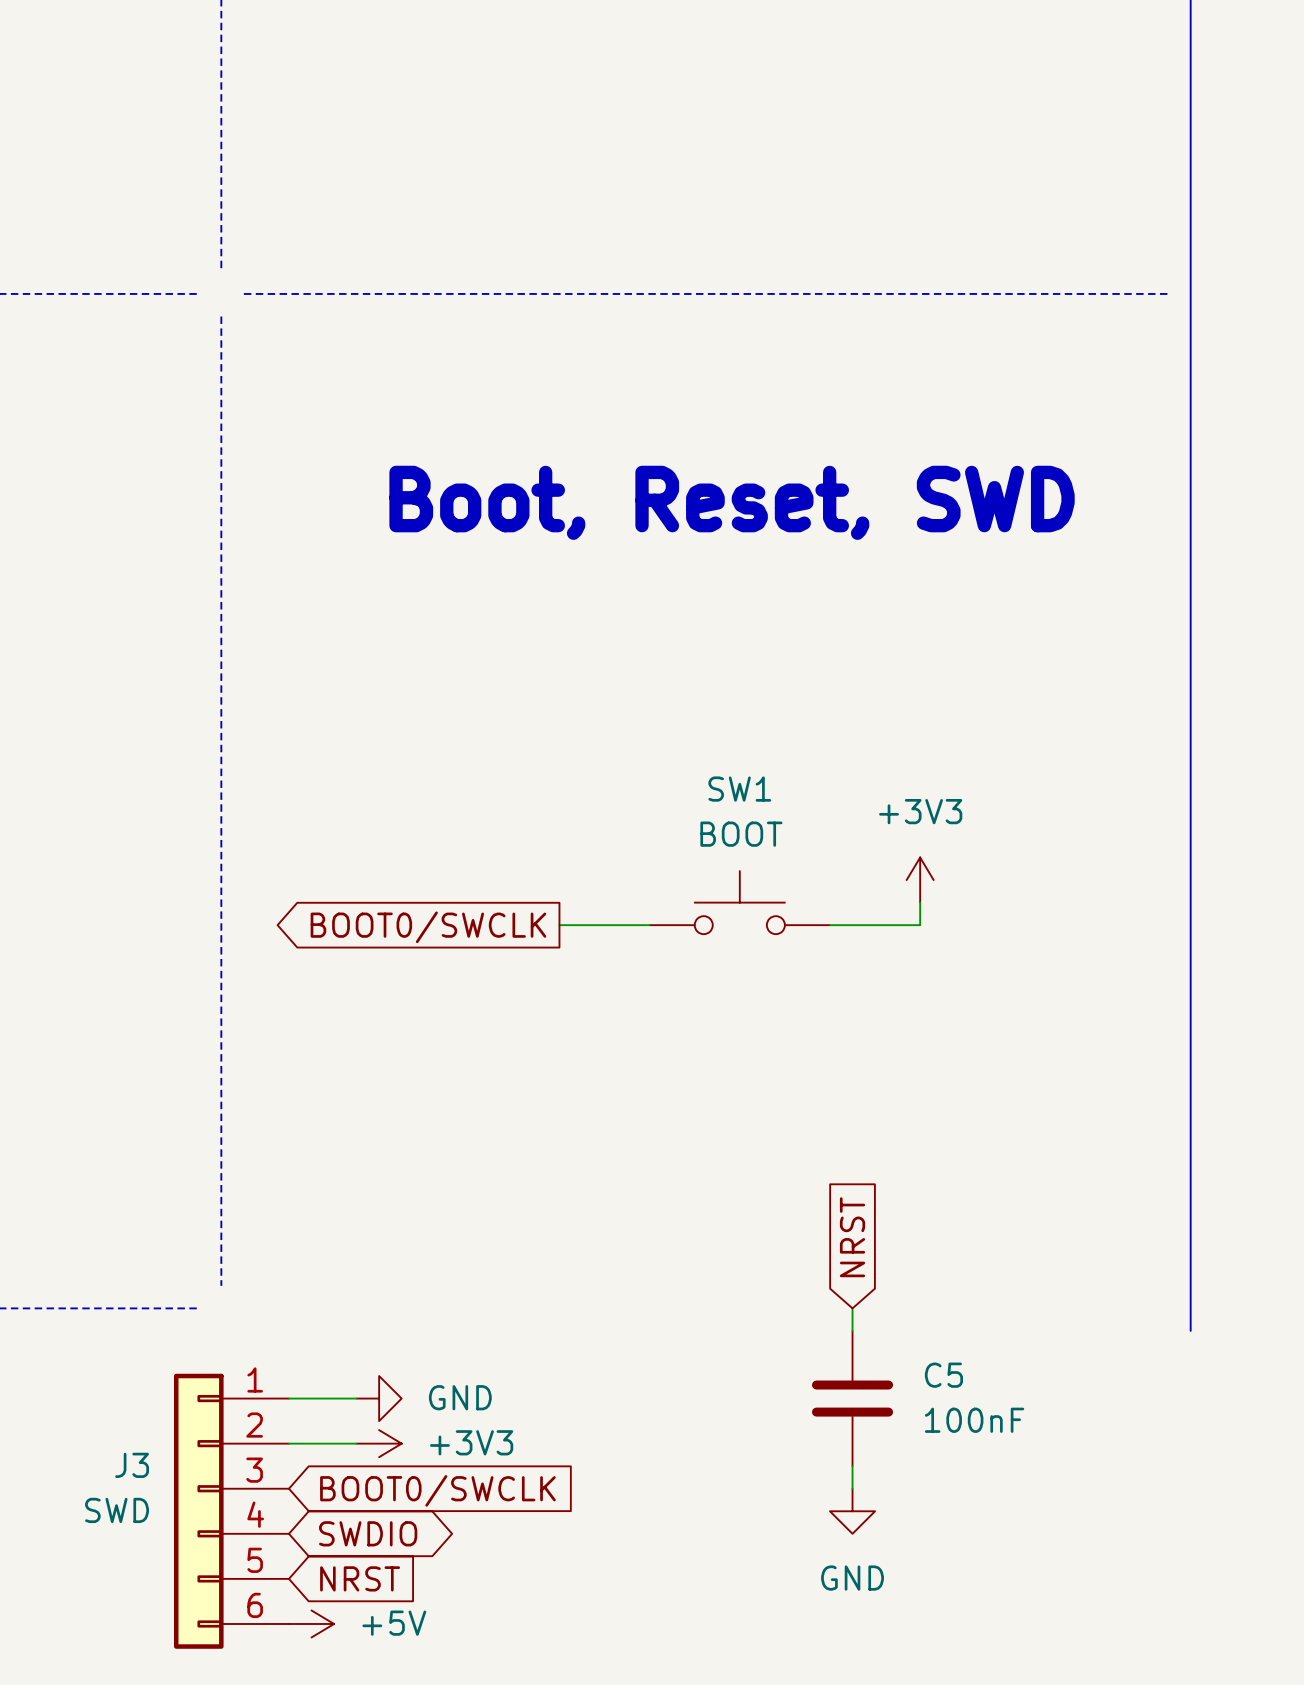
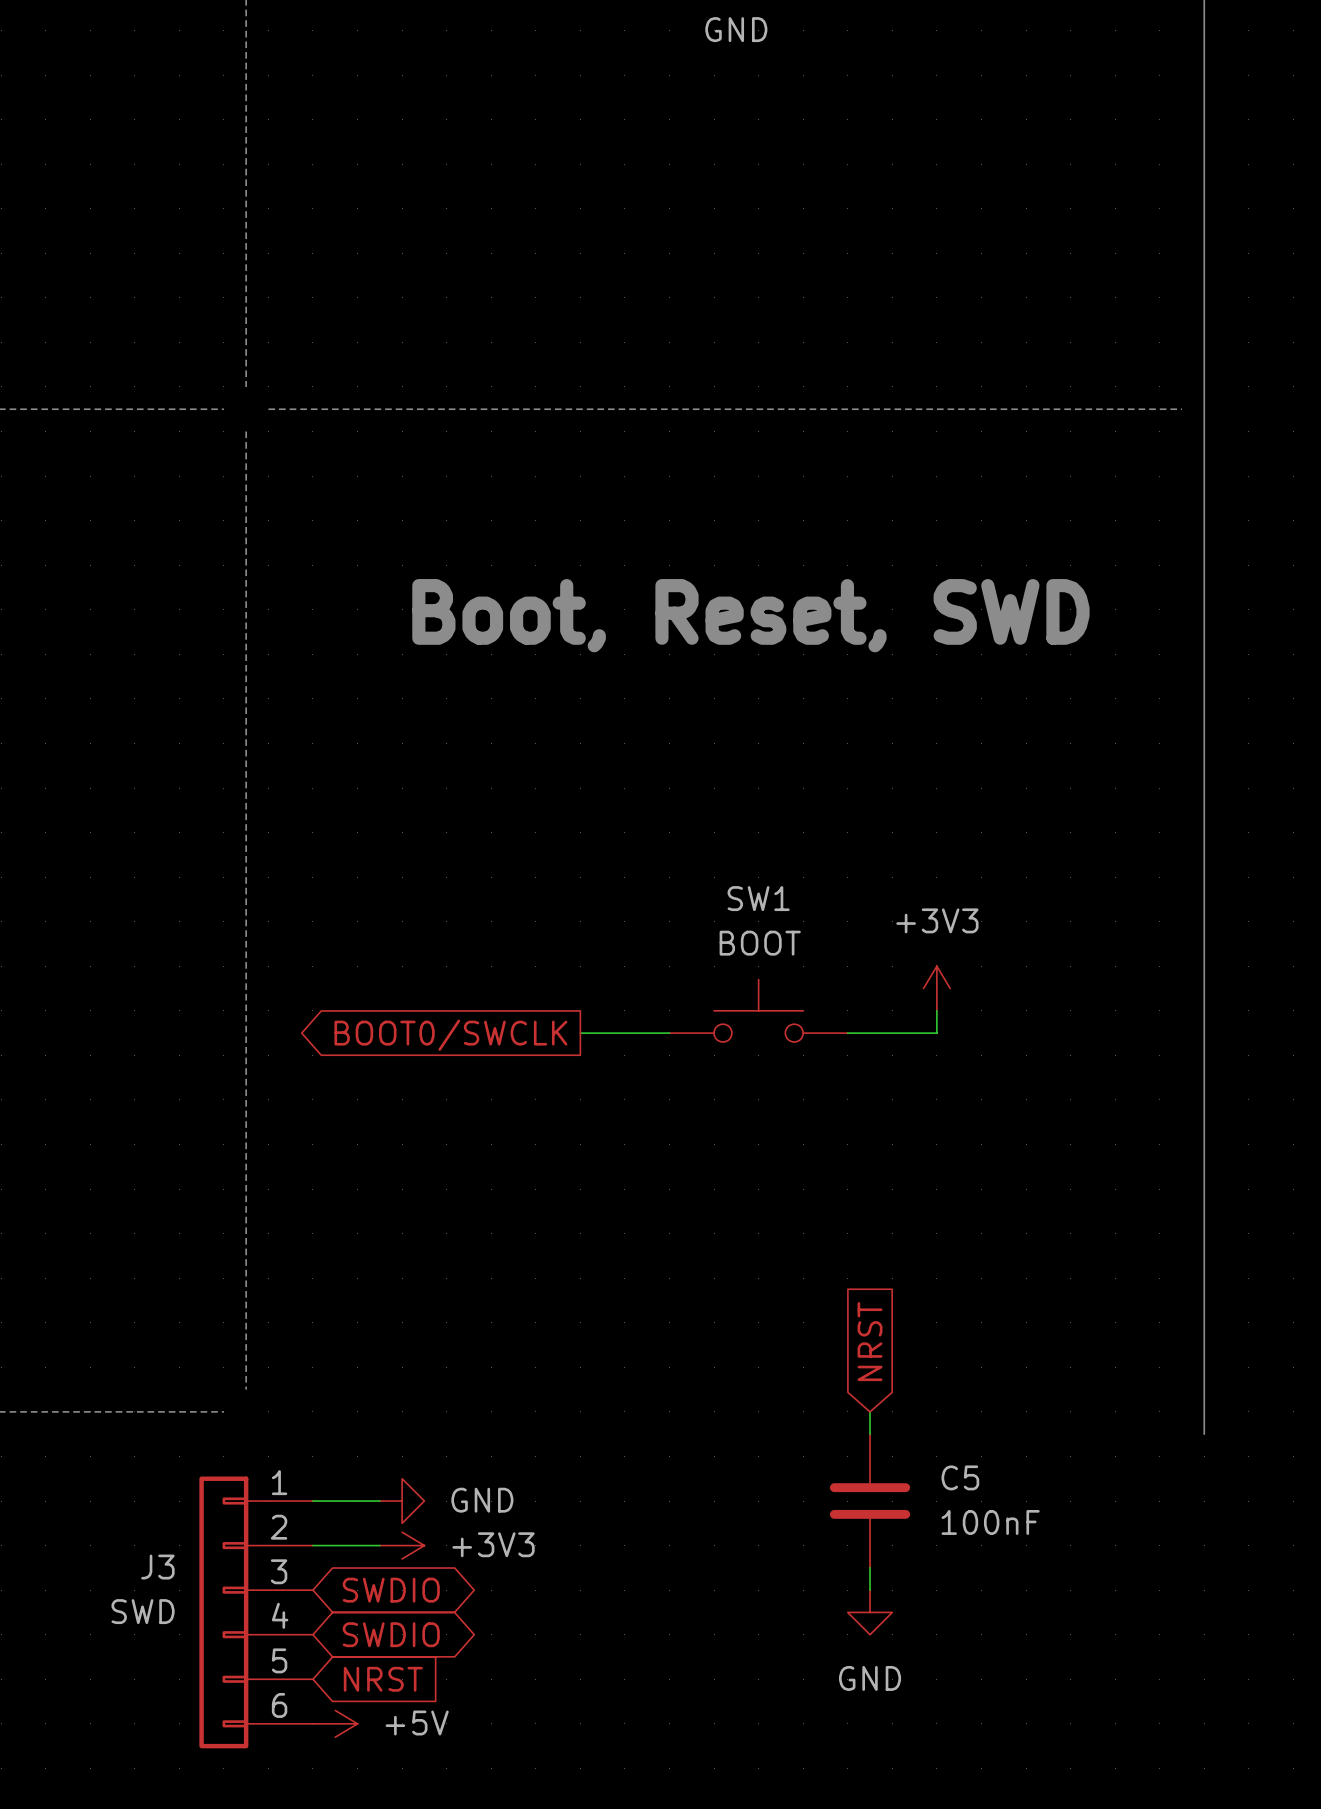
global label shape: input (437, 1490) -> bidirectional (391, 1590)
global label: BOOT0/SWCLK (437, 1490) -> SWDIO (391, 1590)

